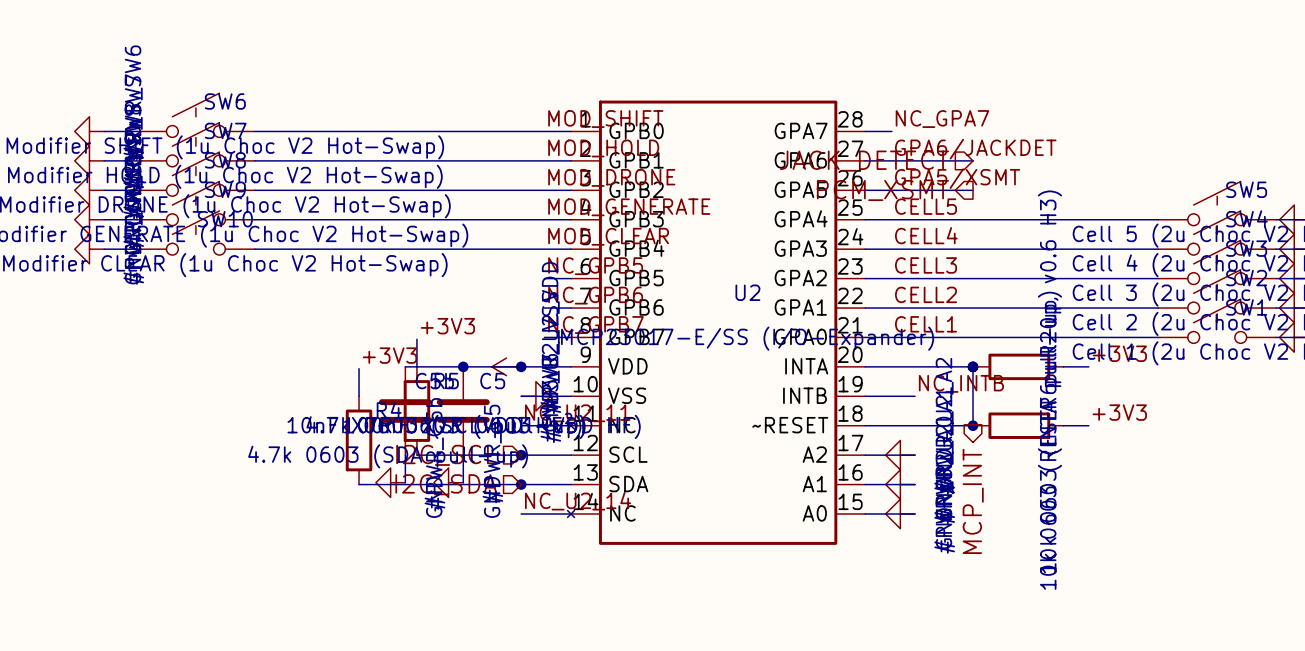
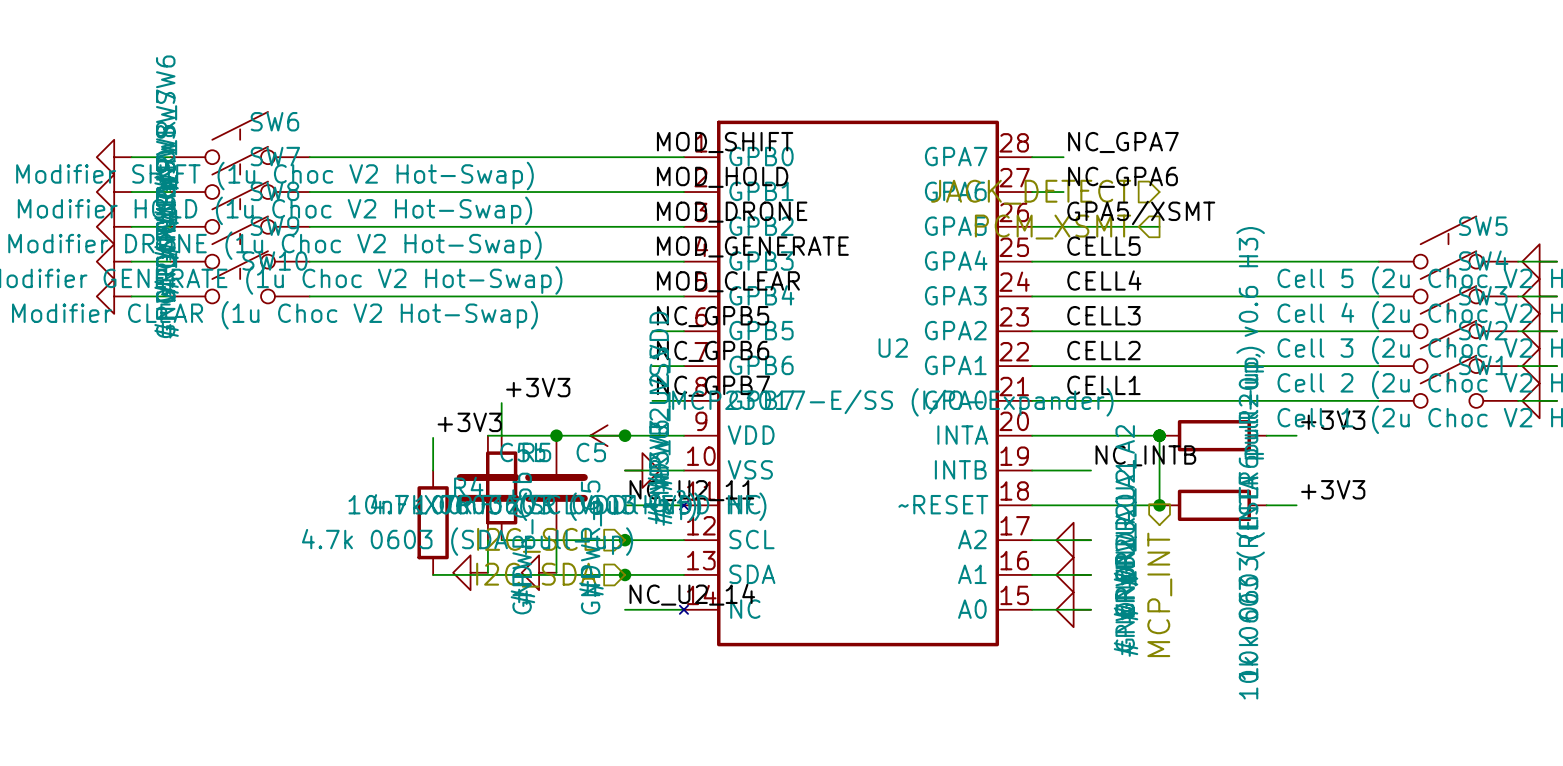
label: GPA6/JACKDET (975, 149) -> NC_GPA6 (1123, 177)
wire: (891, 160) (973, 160) -> none

